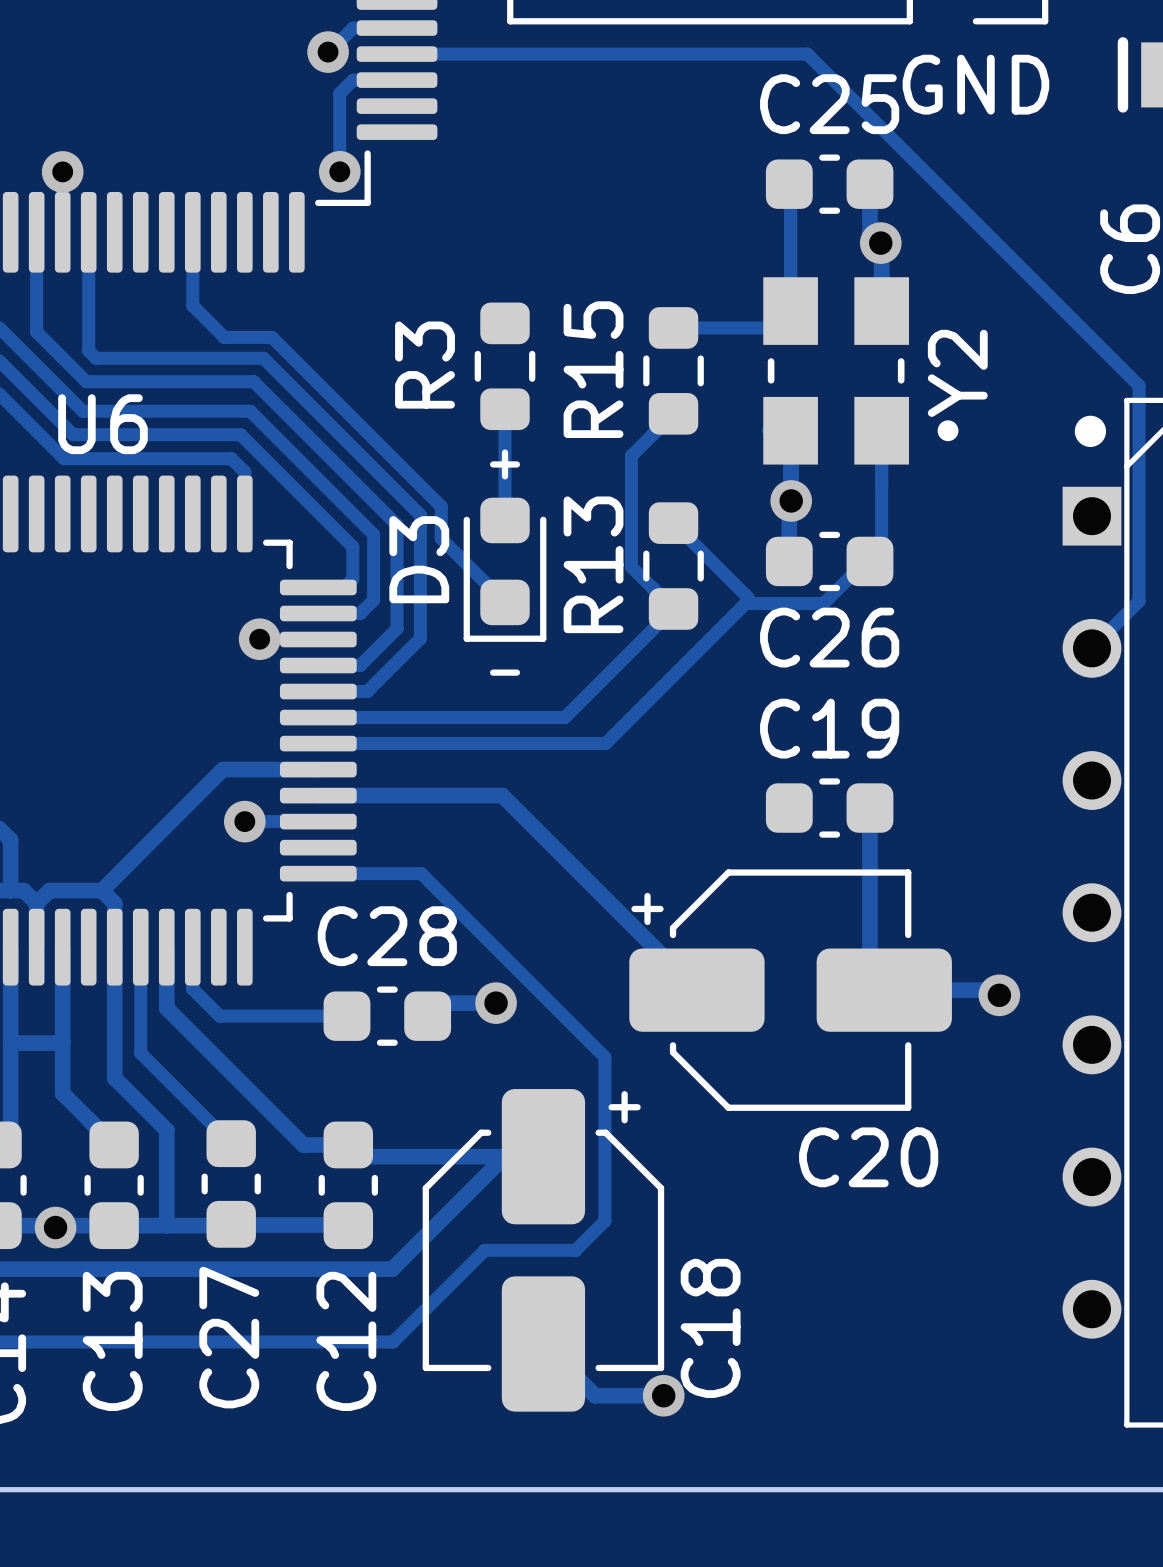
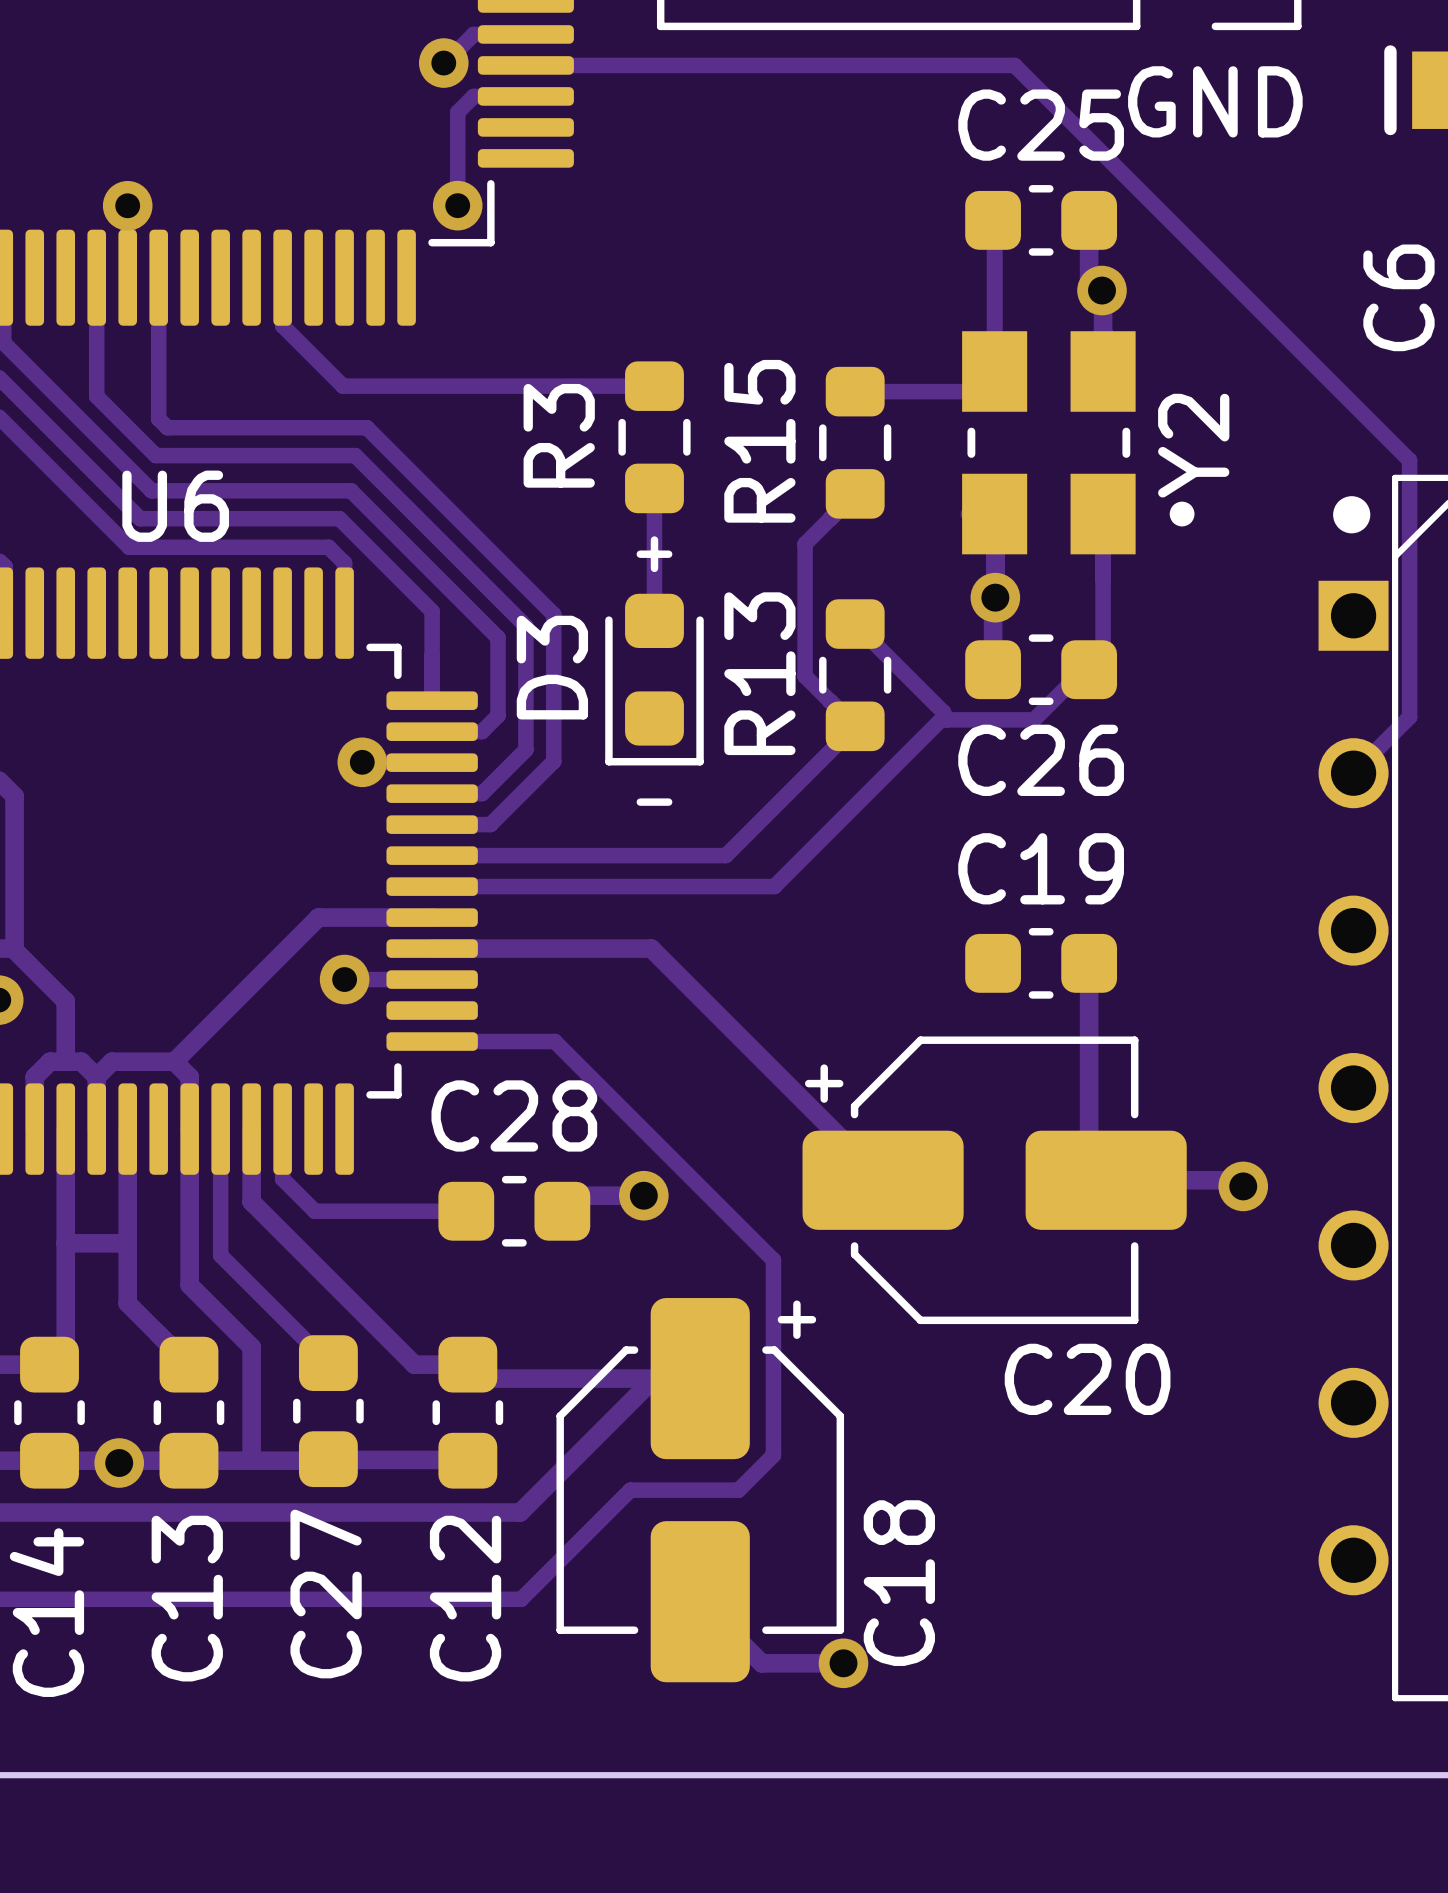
track: (192, 272) (192, 305) (224, 337) (272, 337) (441, 506) (441, 538) (505, 602) -> (282, 325) (343, 386) (654, 386)
track: (240, 434) (352, 546) (352, 579) (344, 587) (318, 587) -> (339, 518) (432, 611) (432, 700)

